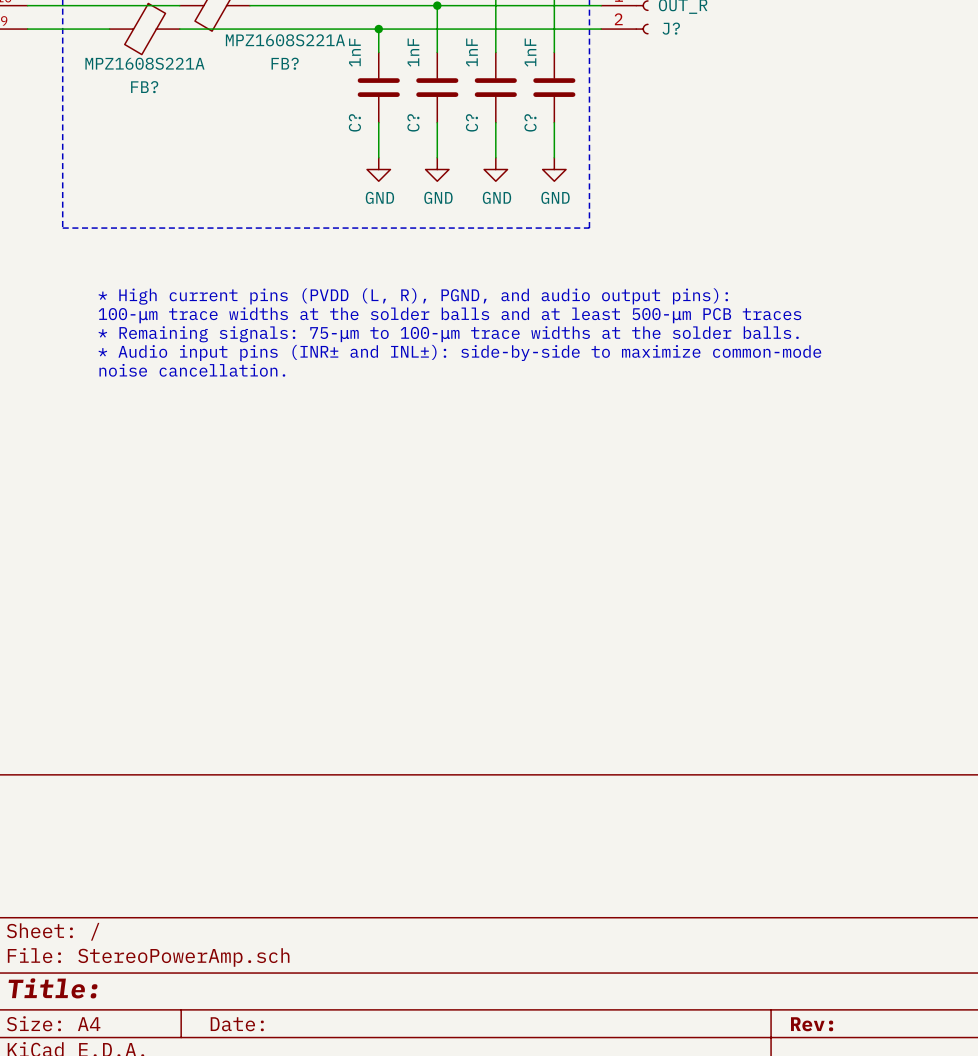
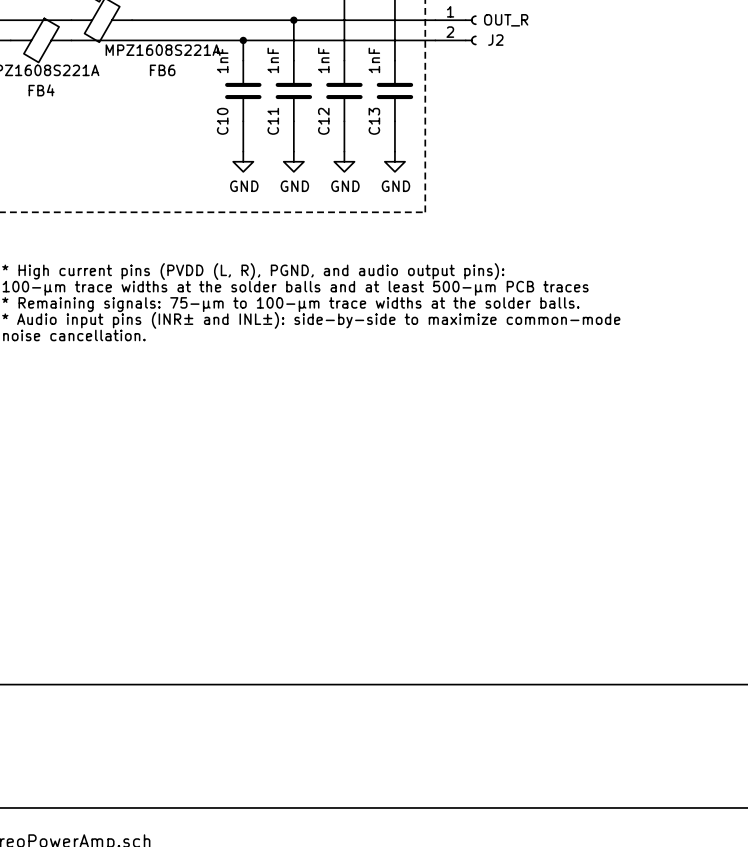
J? name: J? (671, 28) -> J2 (495, 40)
FB? name: FB? (285, 63) -> FB6 (162, 70)
FB? name: FB? (144, 87) -> FB4 (41, 90)
C? name: C? (354, 122) -> C10 (222, 121)
C? name: C? (413, 122) -> C11 (273, 121)
C? name: C? (471, 122) -> C12 (323, 121)
C? name: C? (530, 122) -> C13 (374, 121)

